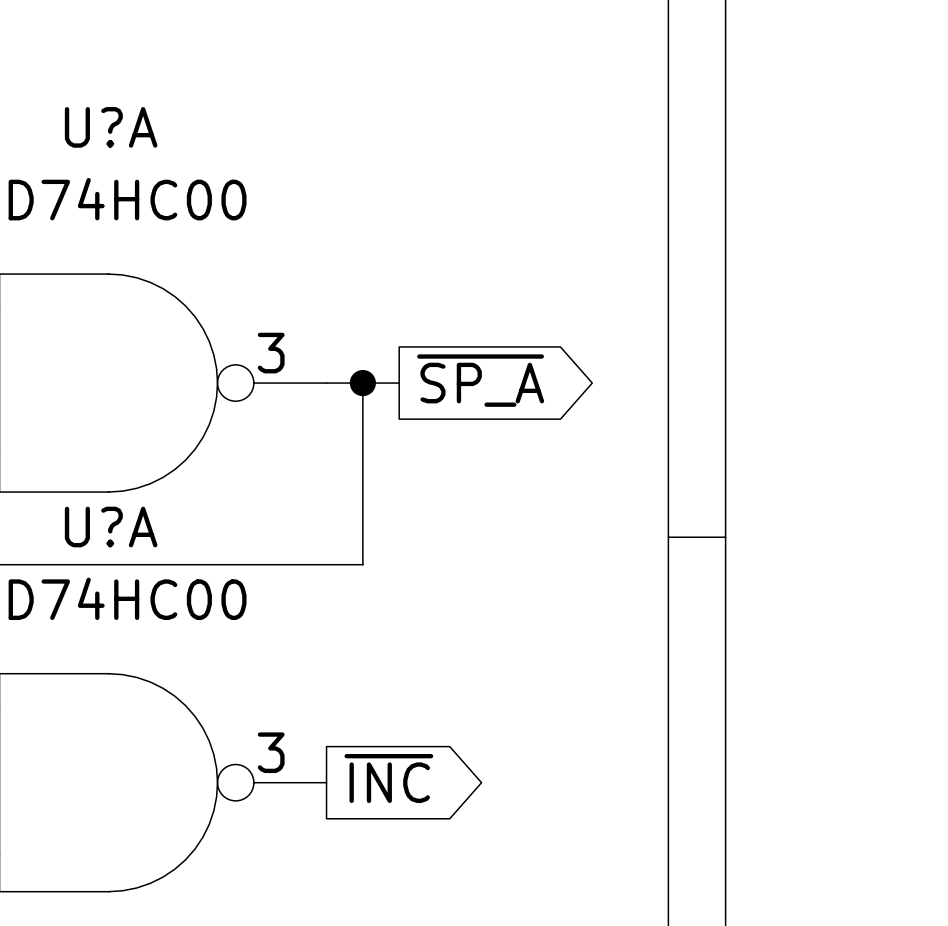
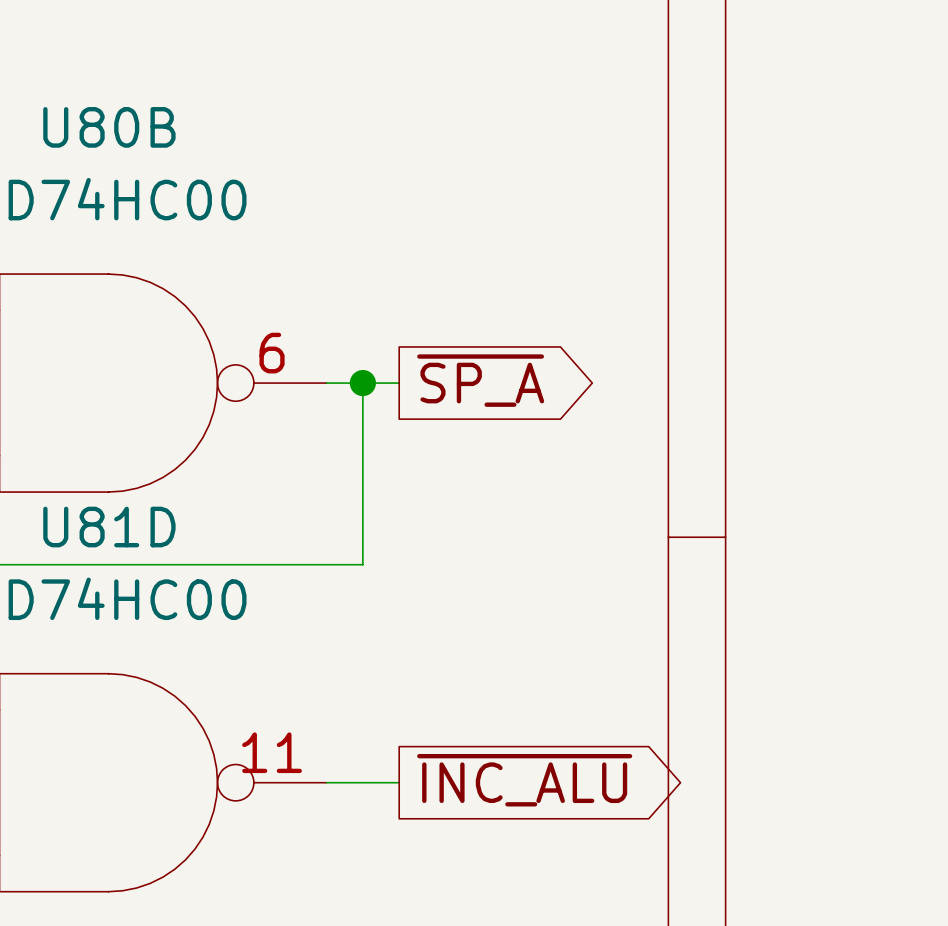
U?A name: U?A (111, 127) -> U80B (109, 127)
U?A pin number: 3 (271, 353) -> 6 (272, 353)
U?A name: U?A (111, 527) -> U81D (109, 527)
U?A pin number: 3 (271, 752) -> 11 (272, 752)
global label: ~{INC} (388, 778) -> ~{INC_ALU} (524, 780)
wire: none -> (326, 782) (399, 782)

